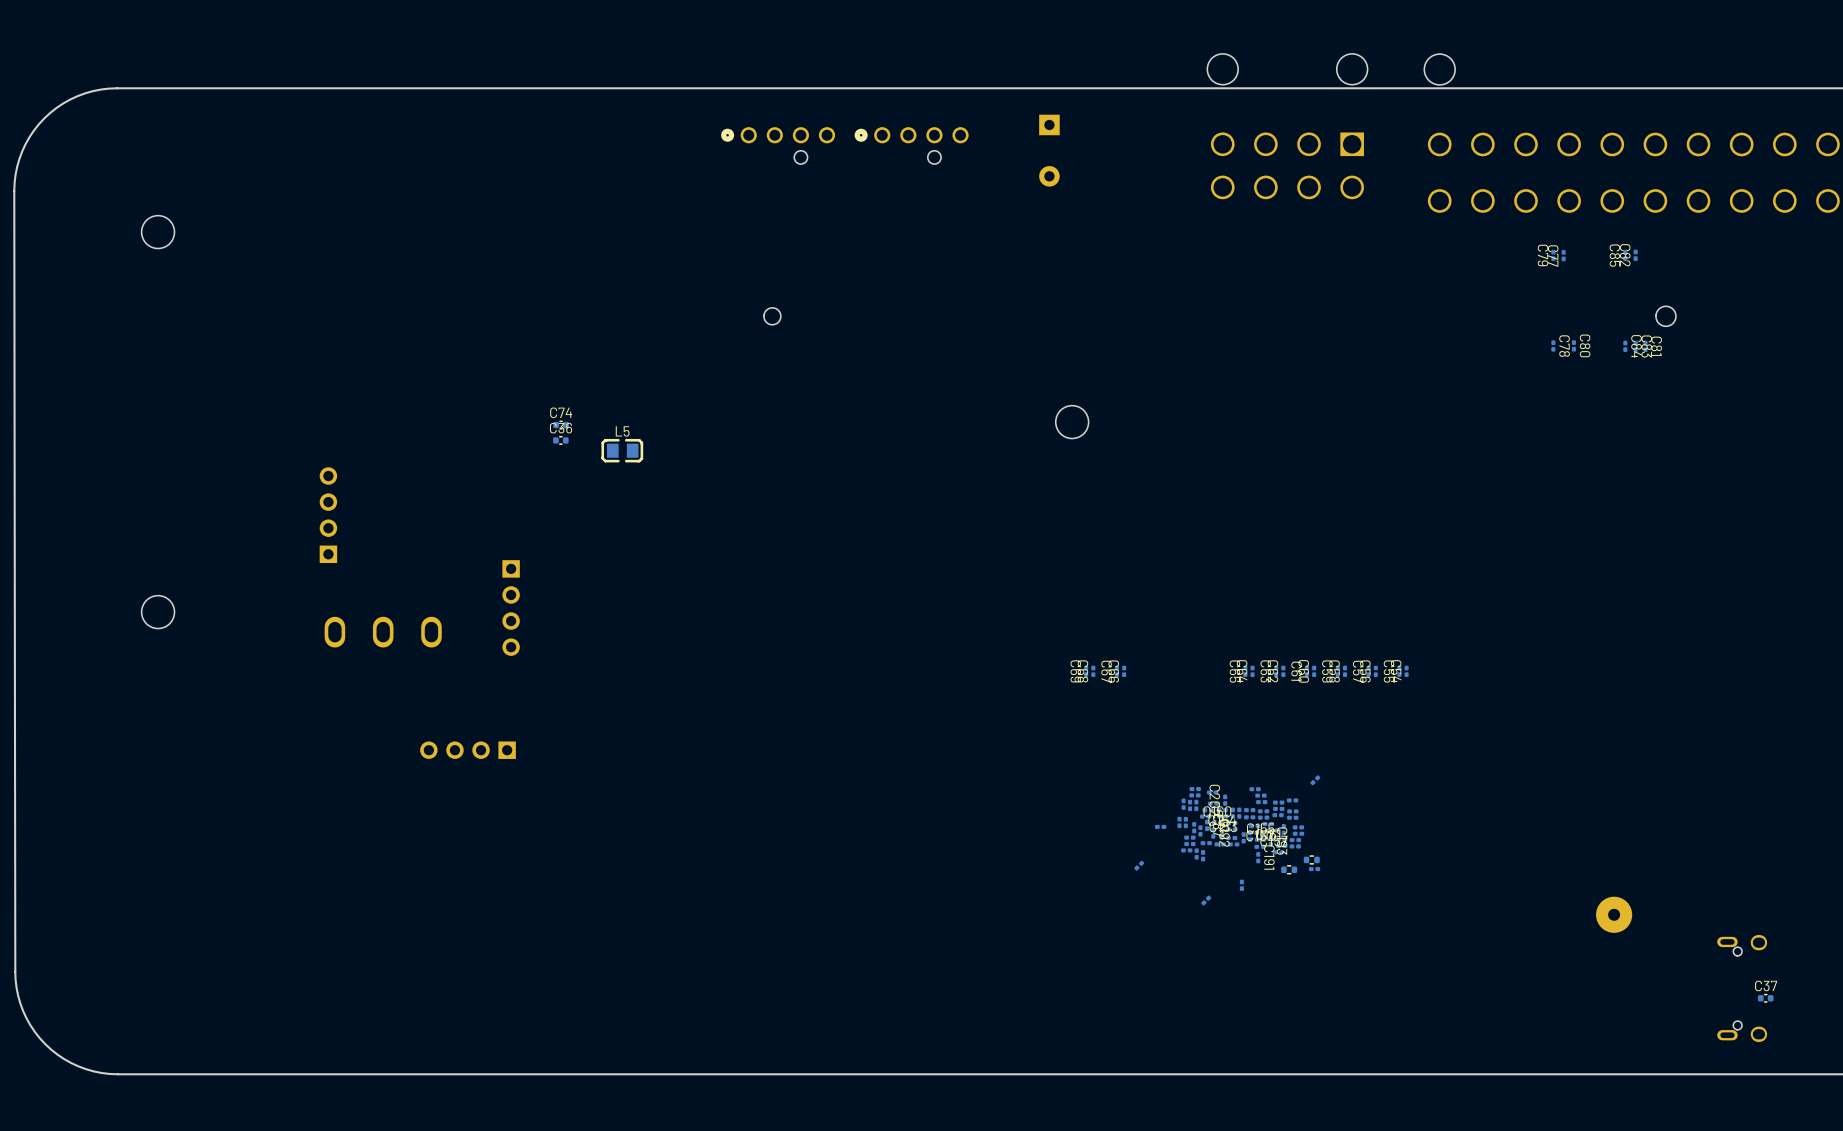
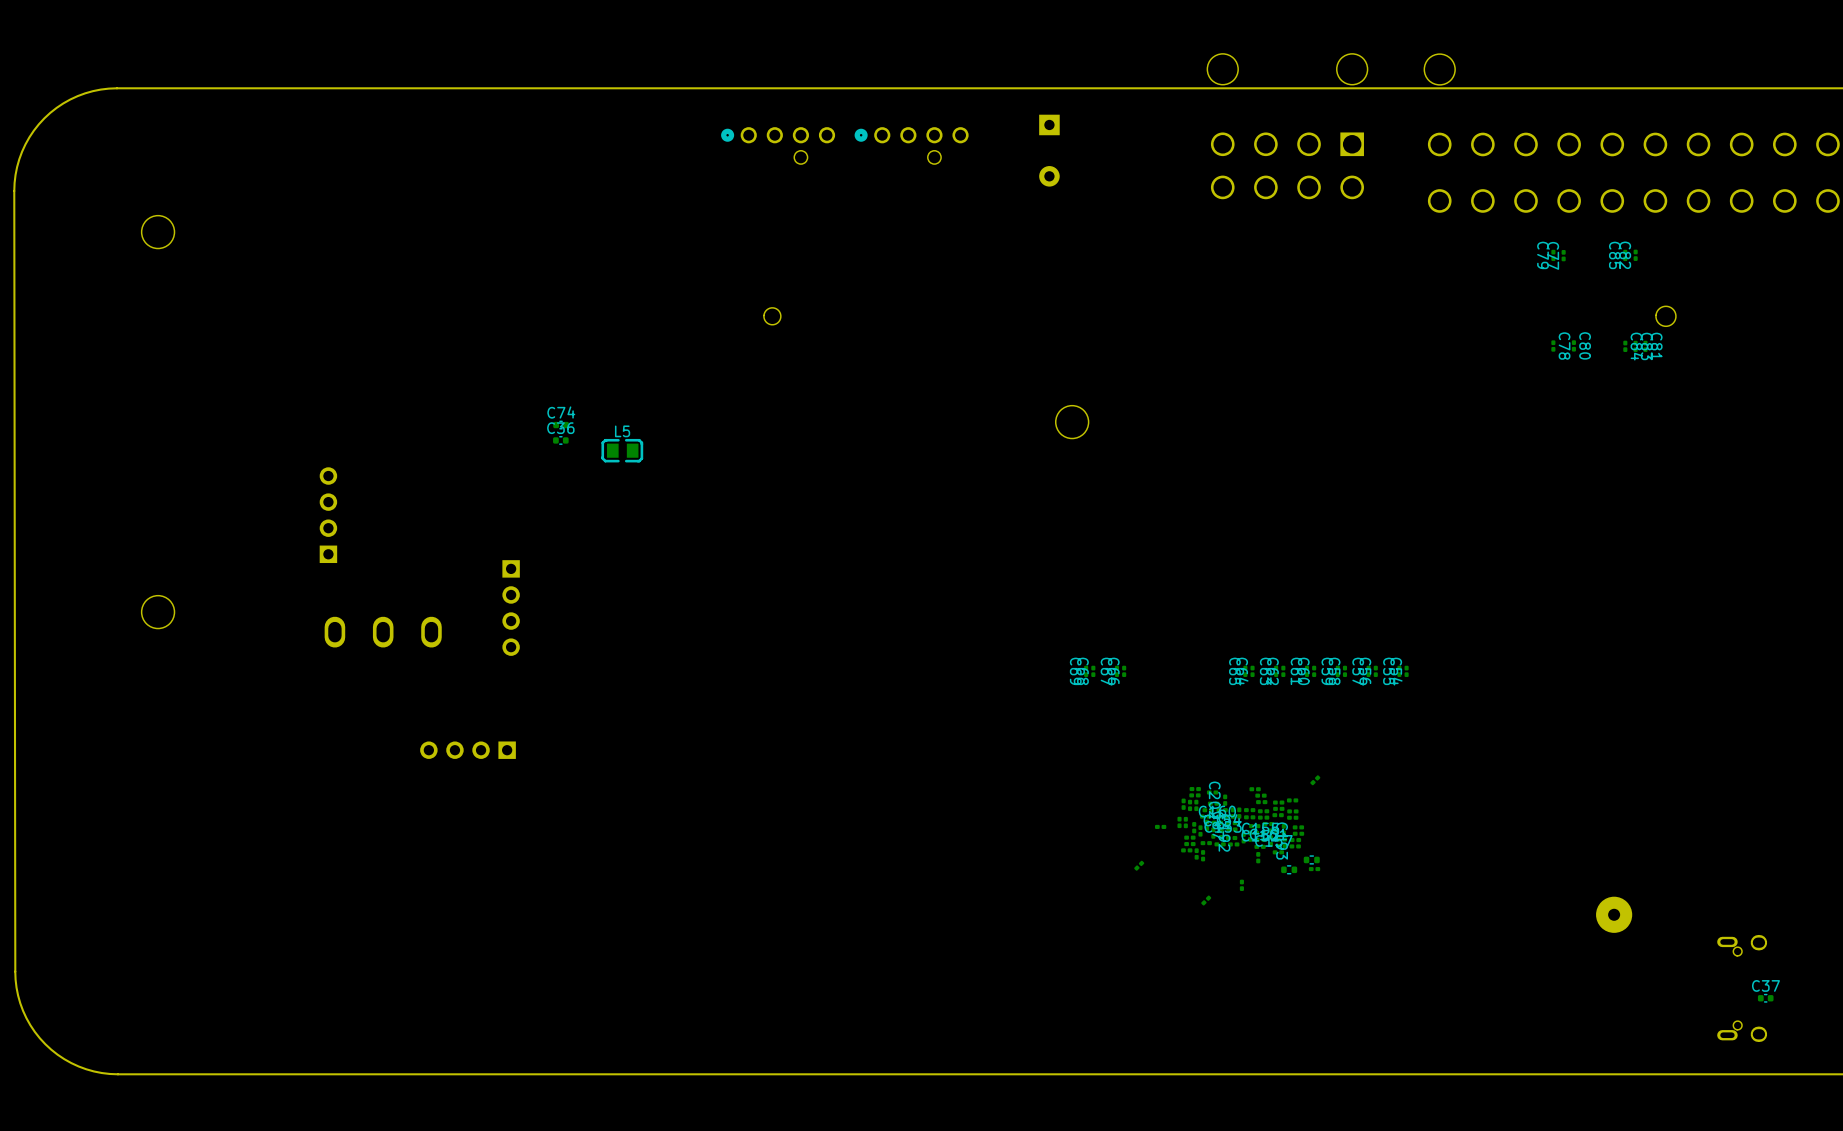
C191 name: C191 (1269, 857) -> none

